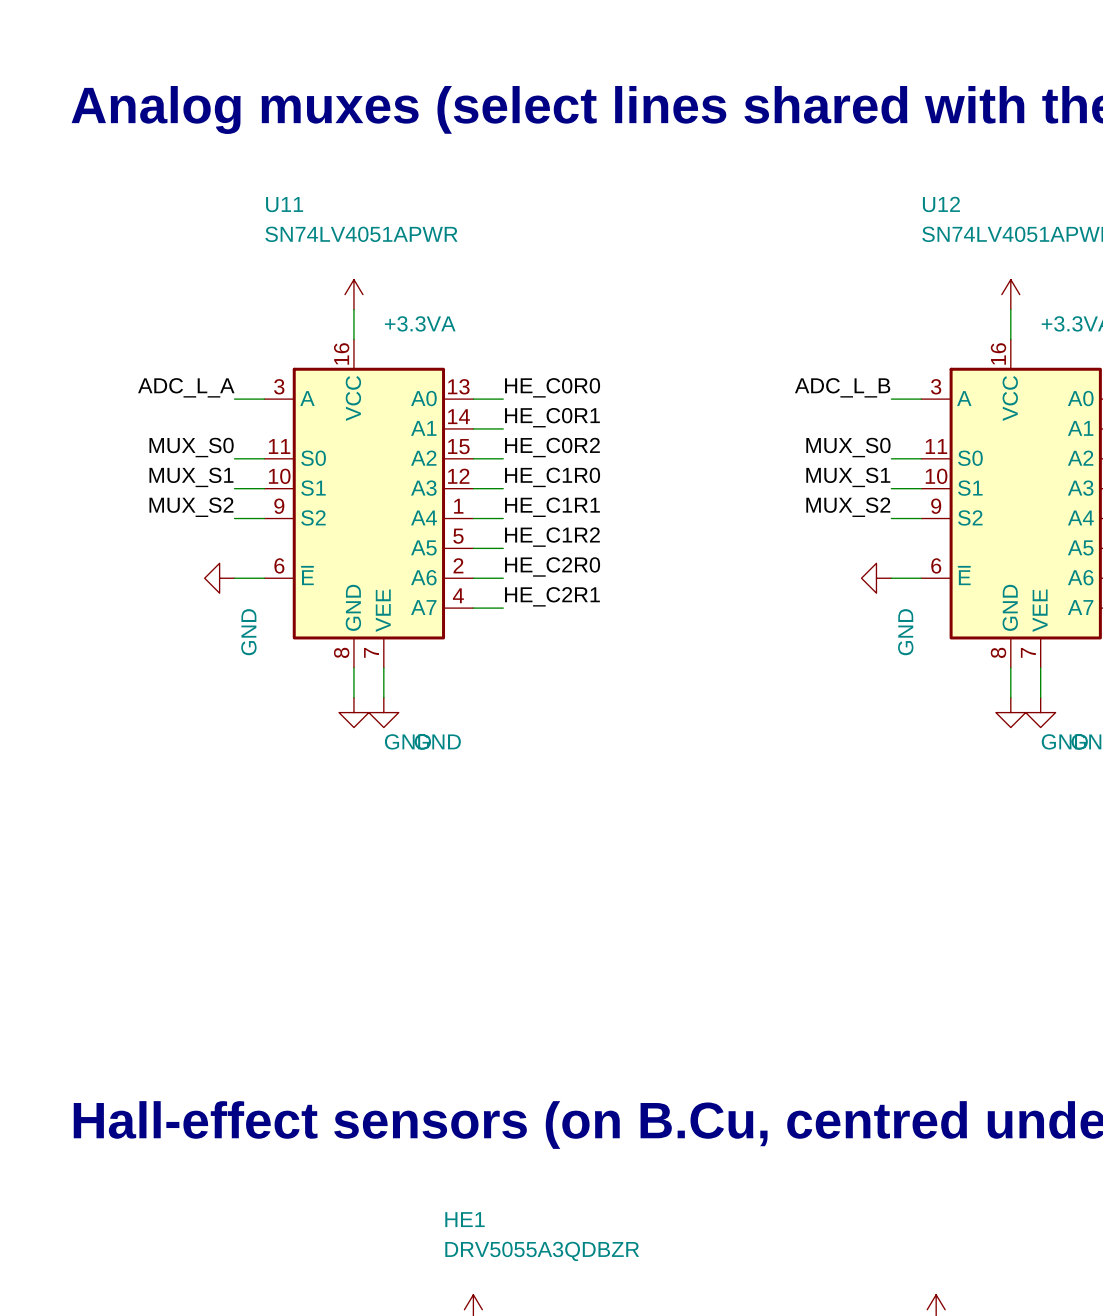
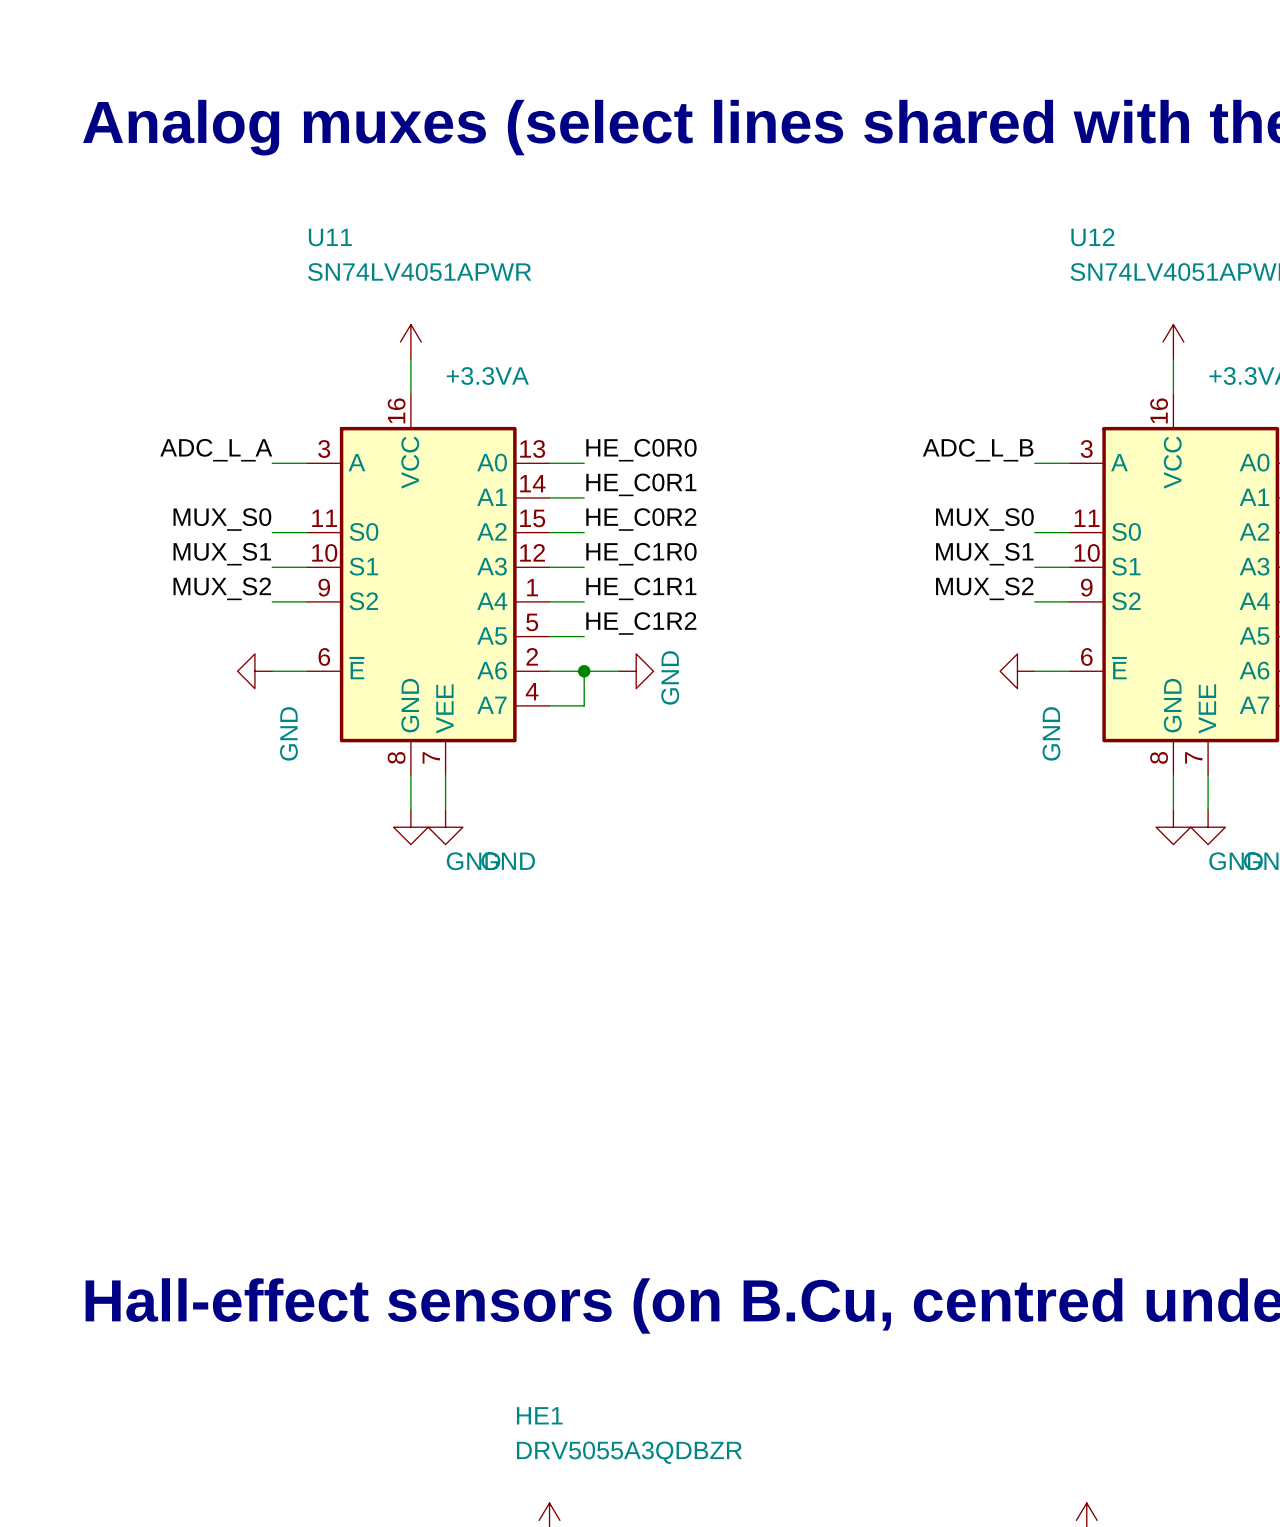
label: HE_C2R0 (552, 566) -> none
junction: none -> (584, 671)
wire: none -> (618, 671) (584, 671) (584, 705)
power symbol: none -> GND (636, 671)
label: HE_C2R1 (552, 596) -> none

